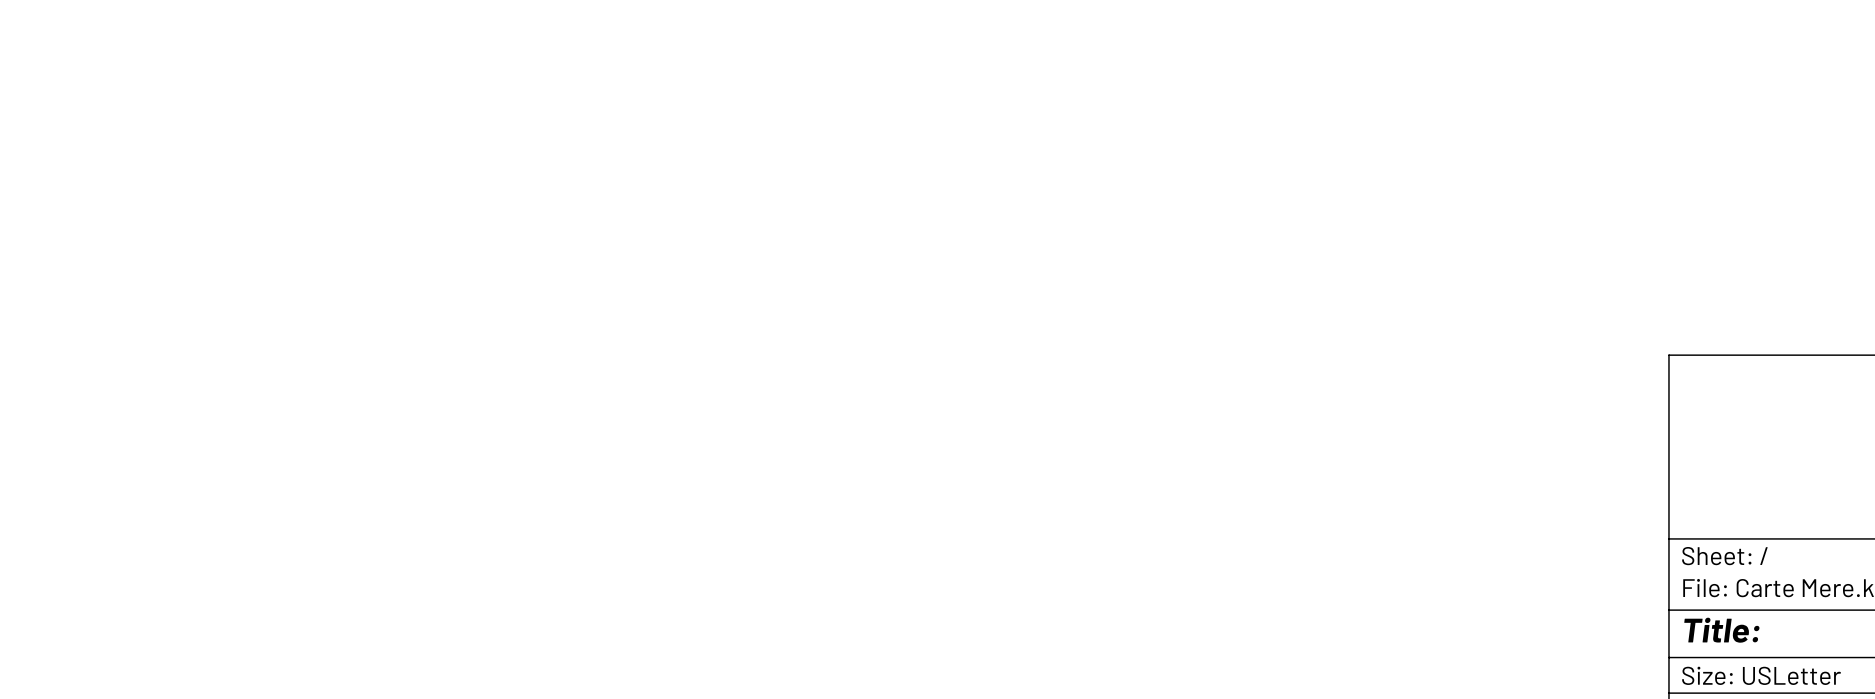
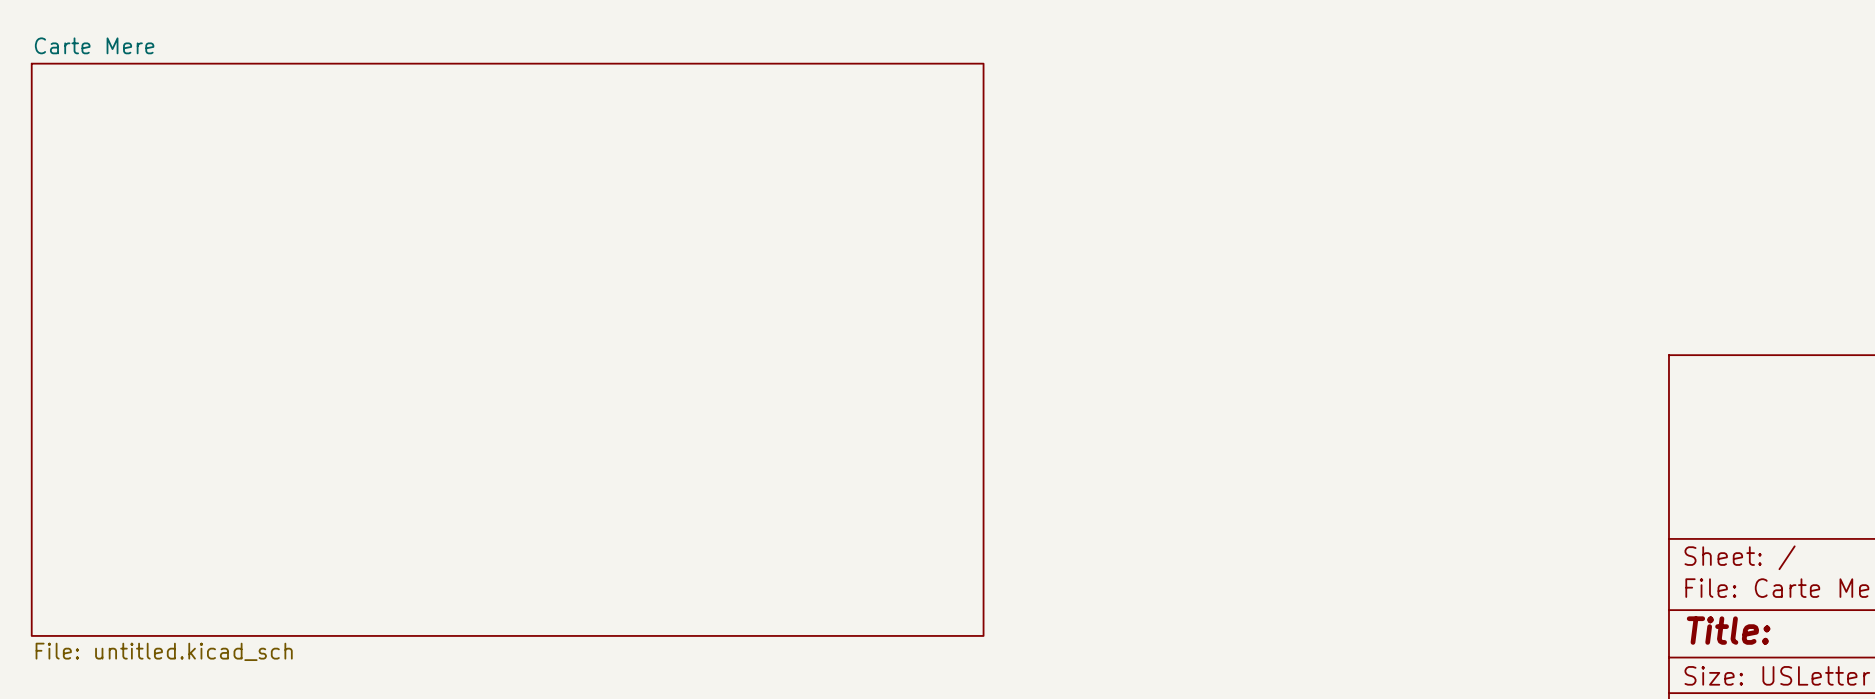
sheet Carte Mere: none -> File: untitled.kicad_sch (507, 349)

